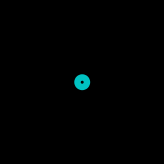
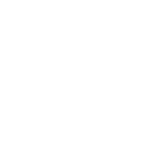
part: (82, 82) -> none

